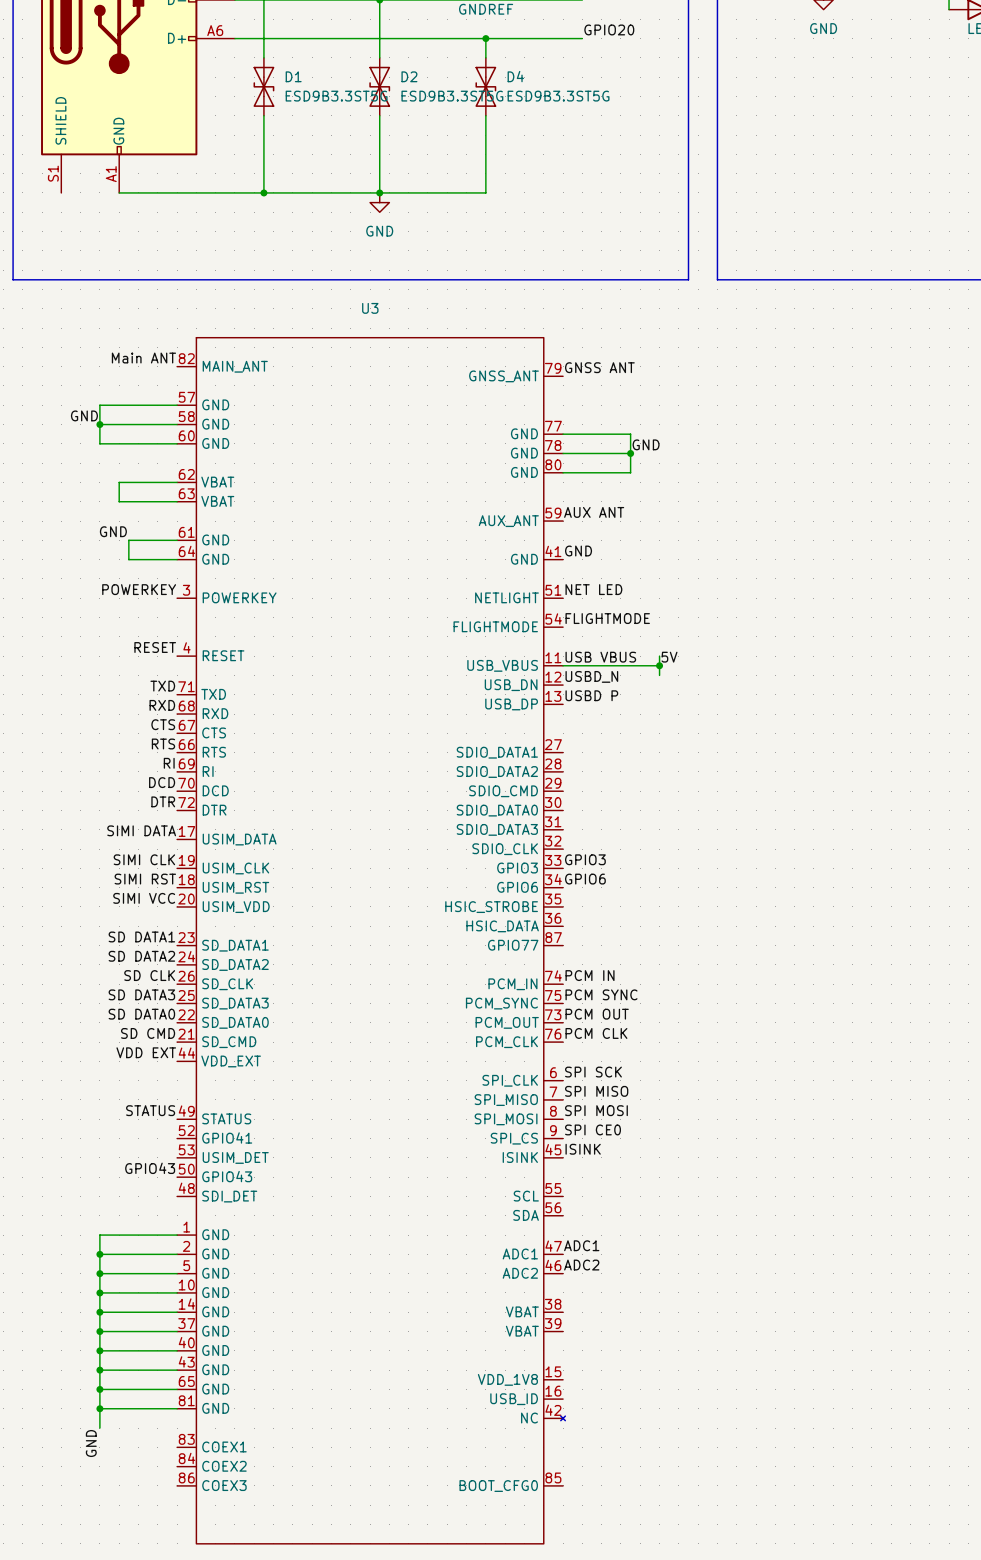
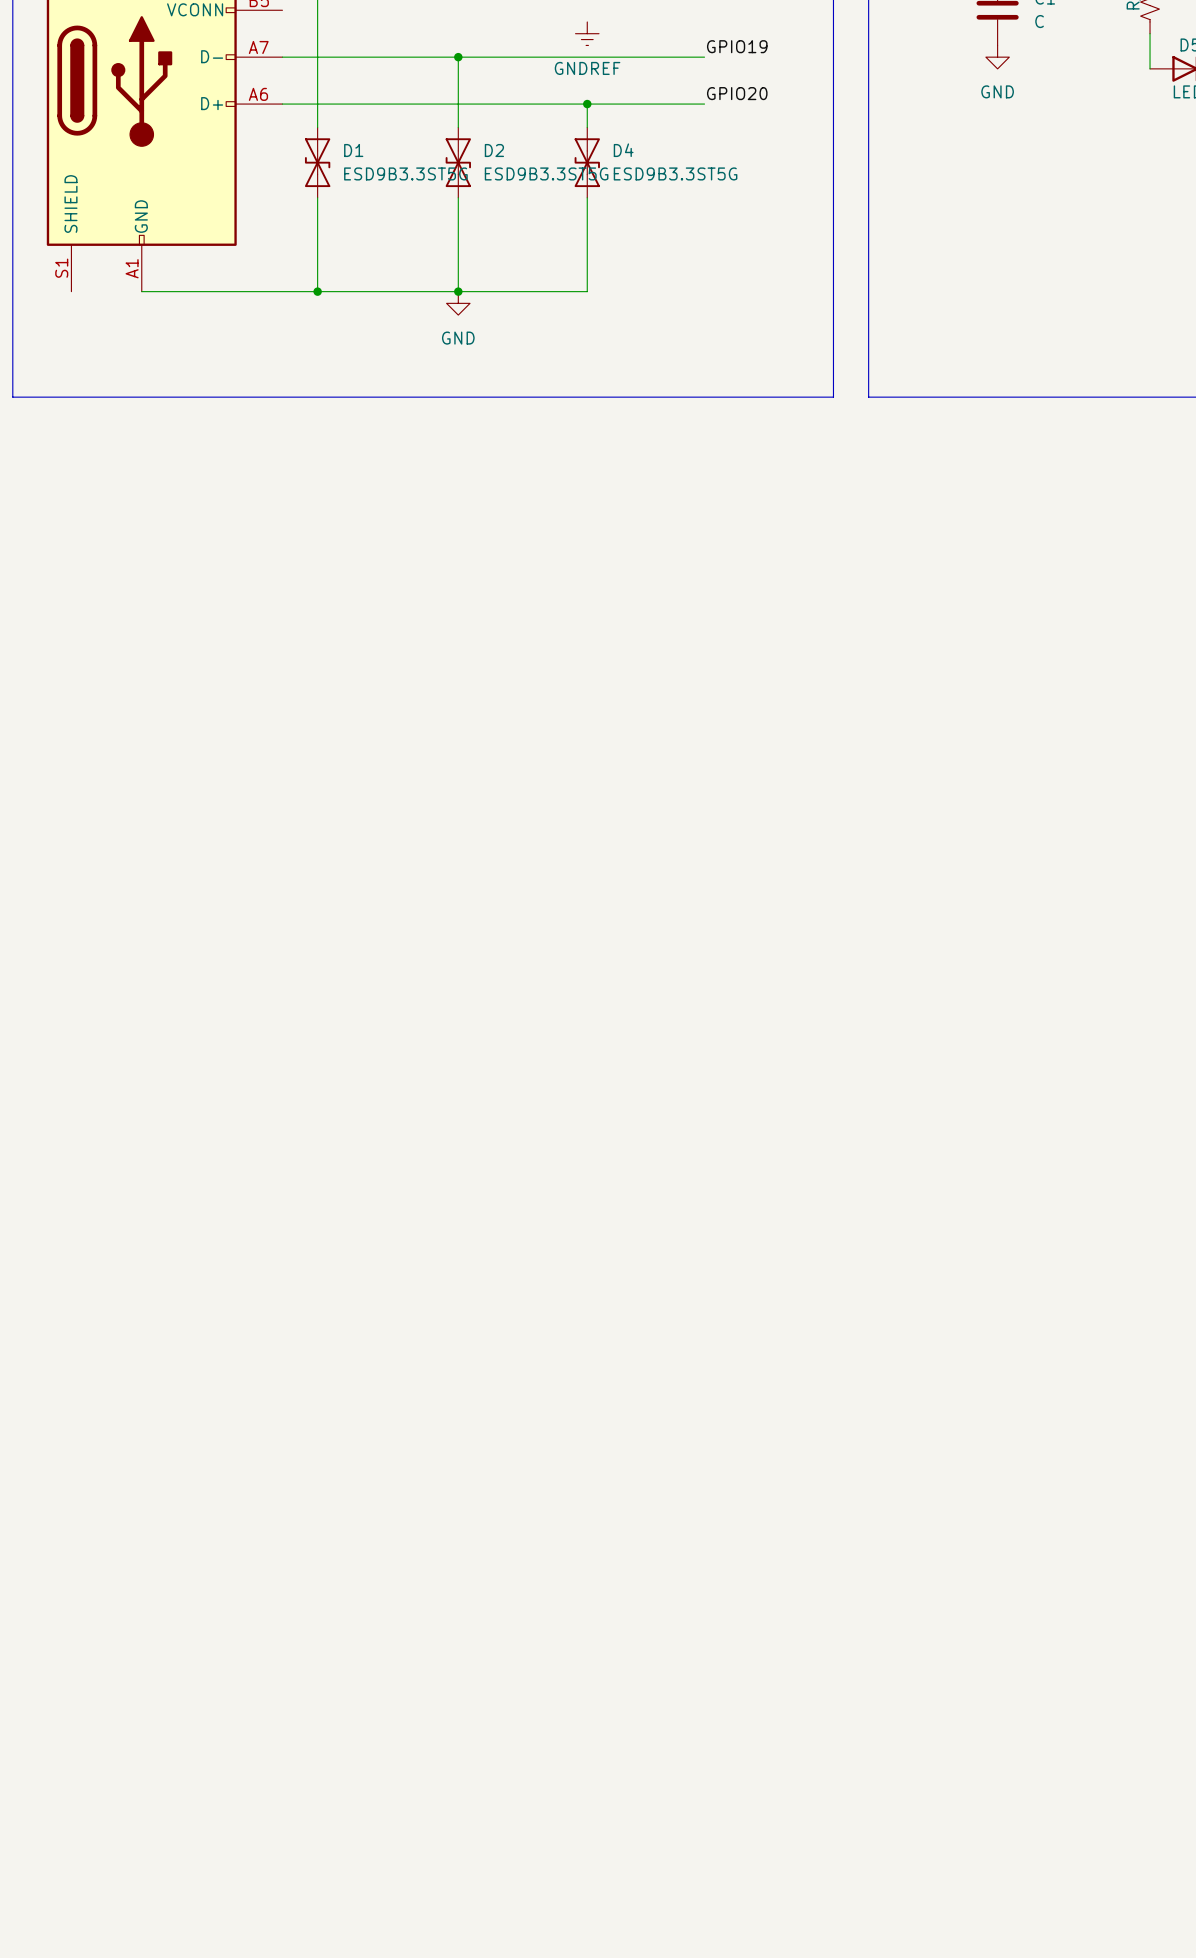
label: Main ANT (143, 358) -> none
label: GNSS ANT (599, 367) -> none
wire: (177, 405) (99, 405) (99, 443) (177, 443) -> none
label: GND (84, 415) -> none
wire: (99, 424) (177, 424) -> none
junction: (99, 424) -> none
wire: (563, 434) (630, 434) (630, 472) (563, 472) -> none
label: GND (646, 444) -> none
wire: (563, 453) (630, 453) -> none
junction: (630, 453) -> none
wire: (177, 482) (119, 482) (119, 501) (177, 501) -> none
label: AUX ANT (594, 512) -> none
label: GND (113, 531) -> none
wire: (177, 540) (128, 540) (128, 559) (177, 559) -> none
label: GND (578, 551) -> none
label: POWERKEY (139, 589) -> none
label: NET LED (593, 589) -> none
label: FLIGHTMODE (607, 618) -> none
label: RESET (155, 647) -> none
wire: (659, 656) (659, 675) -> none
label: USB VBUS (600, 657) -> none
label: 5V (669, 657) -> none
wire: (563, 665) (659, 665) -> none
junction: (659, 665) -> none
label: USBD_N (591, 676) -> none
label: TXD (162, 686) -> none
label: USBD P (591, 695) -> none
label: RXD (162, 705) -> none
label: CTS (163, 724) -> none
label: RTS (163, 743) -> none
label: RI (169, 763) -> none
label: DCD (162, 782) -> none
label: DTR (163, 801) -> none
label: SIMI DATA (141, 830) -> none
label: SIMI CLK (144, 859) -> none
label: GPIO3 (585, 859) -> none
label: SIMI RST (145, 879) -> none
label: GPIO6 (585, 879) -> none
label: SIMI VCC (144, 898) -> none
label: SD DATA1 (141, 936) -> none
U3: (371, 940) -> none
label: SD DATA2 (141, 956) -> none
label: SD CLK (149, 975) -> none
label: PCM IN (590, 975) -> none
label: SD DATA3 (141, 994) -> none
label: PCM SYNC (601, 994) -> none
label: SD DATA0 (141, 1014) -> none
label: PCM OUT (597, 1014) -> none
label: SD CMD (148, 1033) -> none
label: PCM CLK (596, 1033) -> none
label: VDD EXT (146, 1052) -> none
label: SPI SCK (593, 1072) -> none
label: SPI MISO (596, 1091) -> none
label: STATUS (150, 1110) -> none
label: SPI MOSI (596, 1110) -> none
label: SPI CE0 (593, 1129) -> none
label: ISINK (583, 1149) -> none
label: GPIO43 (150, 1168) -> none
wire: (177, 1235) (99, 1235) (99, 1428) -> none
label: ADC1 (581, 1245) -> none
wire: (99, 1254) (177, 1254) -> none
junction: (99, 1254) -> none
label: ADC2 (581, 1265) -> none
wire: (99, 1273) (177, 1273) -> none
junction: (99, 1273) -> none
wire: (99, 1292) (177, 1292) -> none
junction: (99, 1292) -> none
wire: (99, 1312) (177, 1312) -> none
junction: (99, 1312) -> none
wire: (99, 1331) (177, 1331) -> none
junction: (99, 1331) -> none
wire: (99, 1350) (177, 1350) -> none
junction: (99, 1350) -> none
wire: (99, 1370) (177, 1370) -> none
junction: (99, 1370) -> none
wire: (99, 1389) (177, 1389) -> none
junction: (99, 1389) -> none
wire: (99, 1408) (177, 1408) -> none
junction: (99, 1408) -> none
label: GND (91, 1443) -> none

